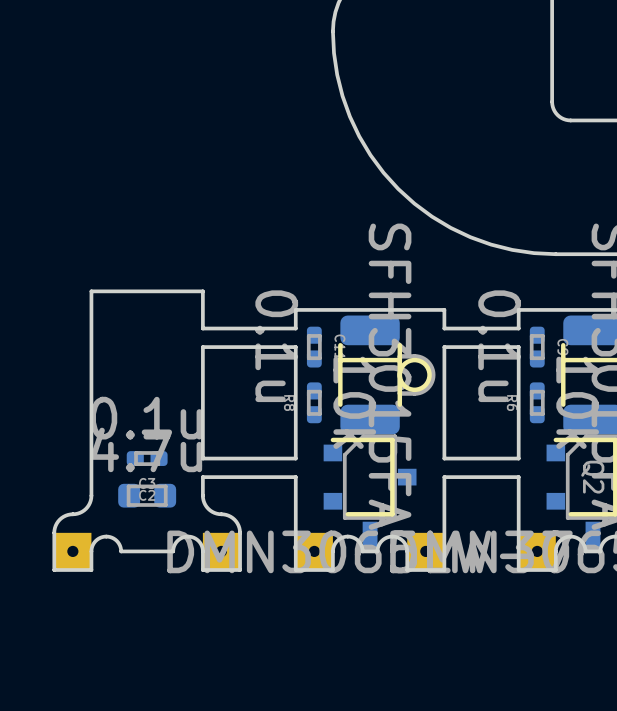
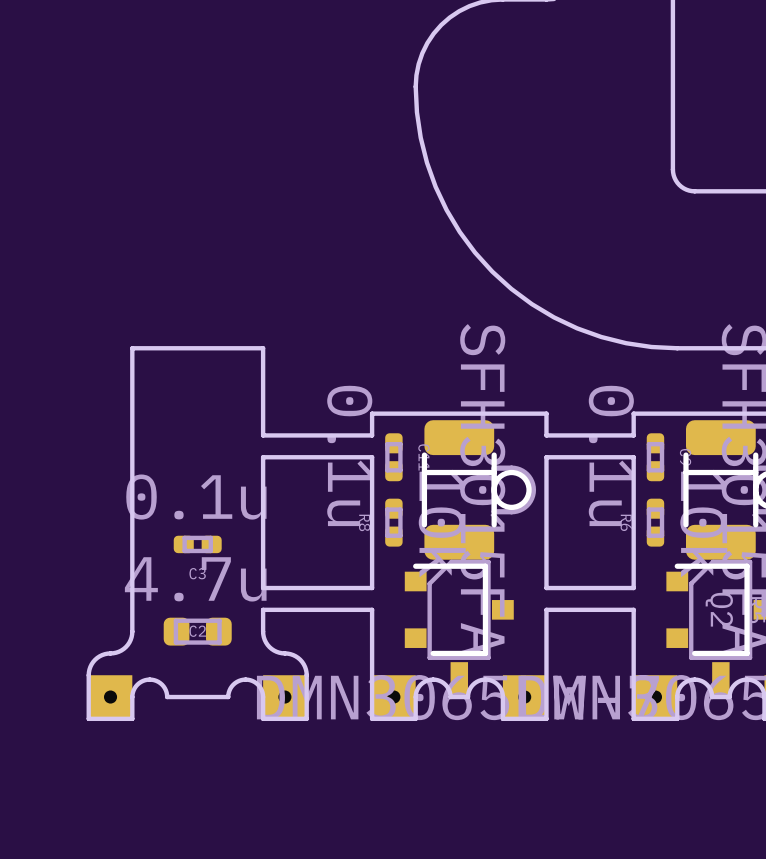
board edge: (202, 291) (91, 291) -> (263, 391) (263, 348) (132, 348) (132, 391)
C3 position: (147, 458) -> (197, 544)

